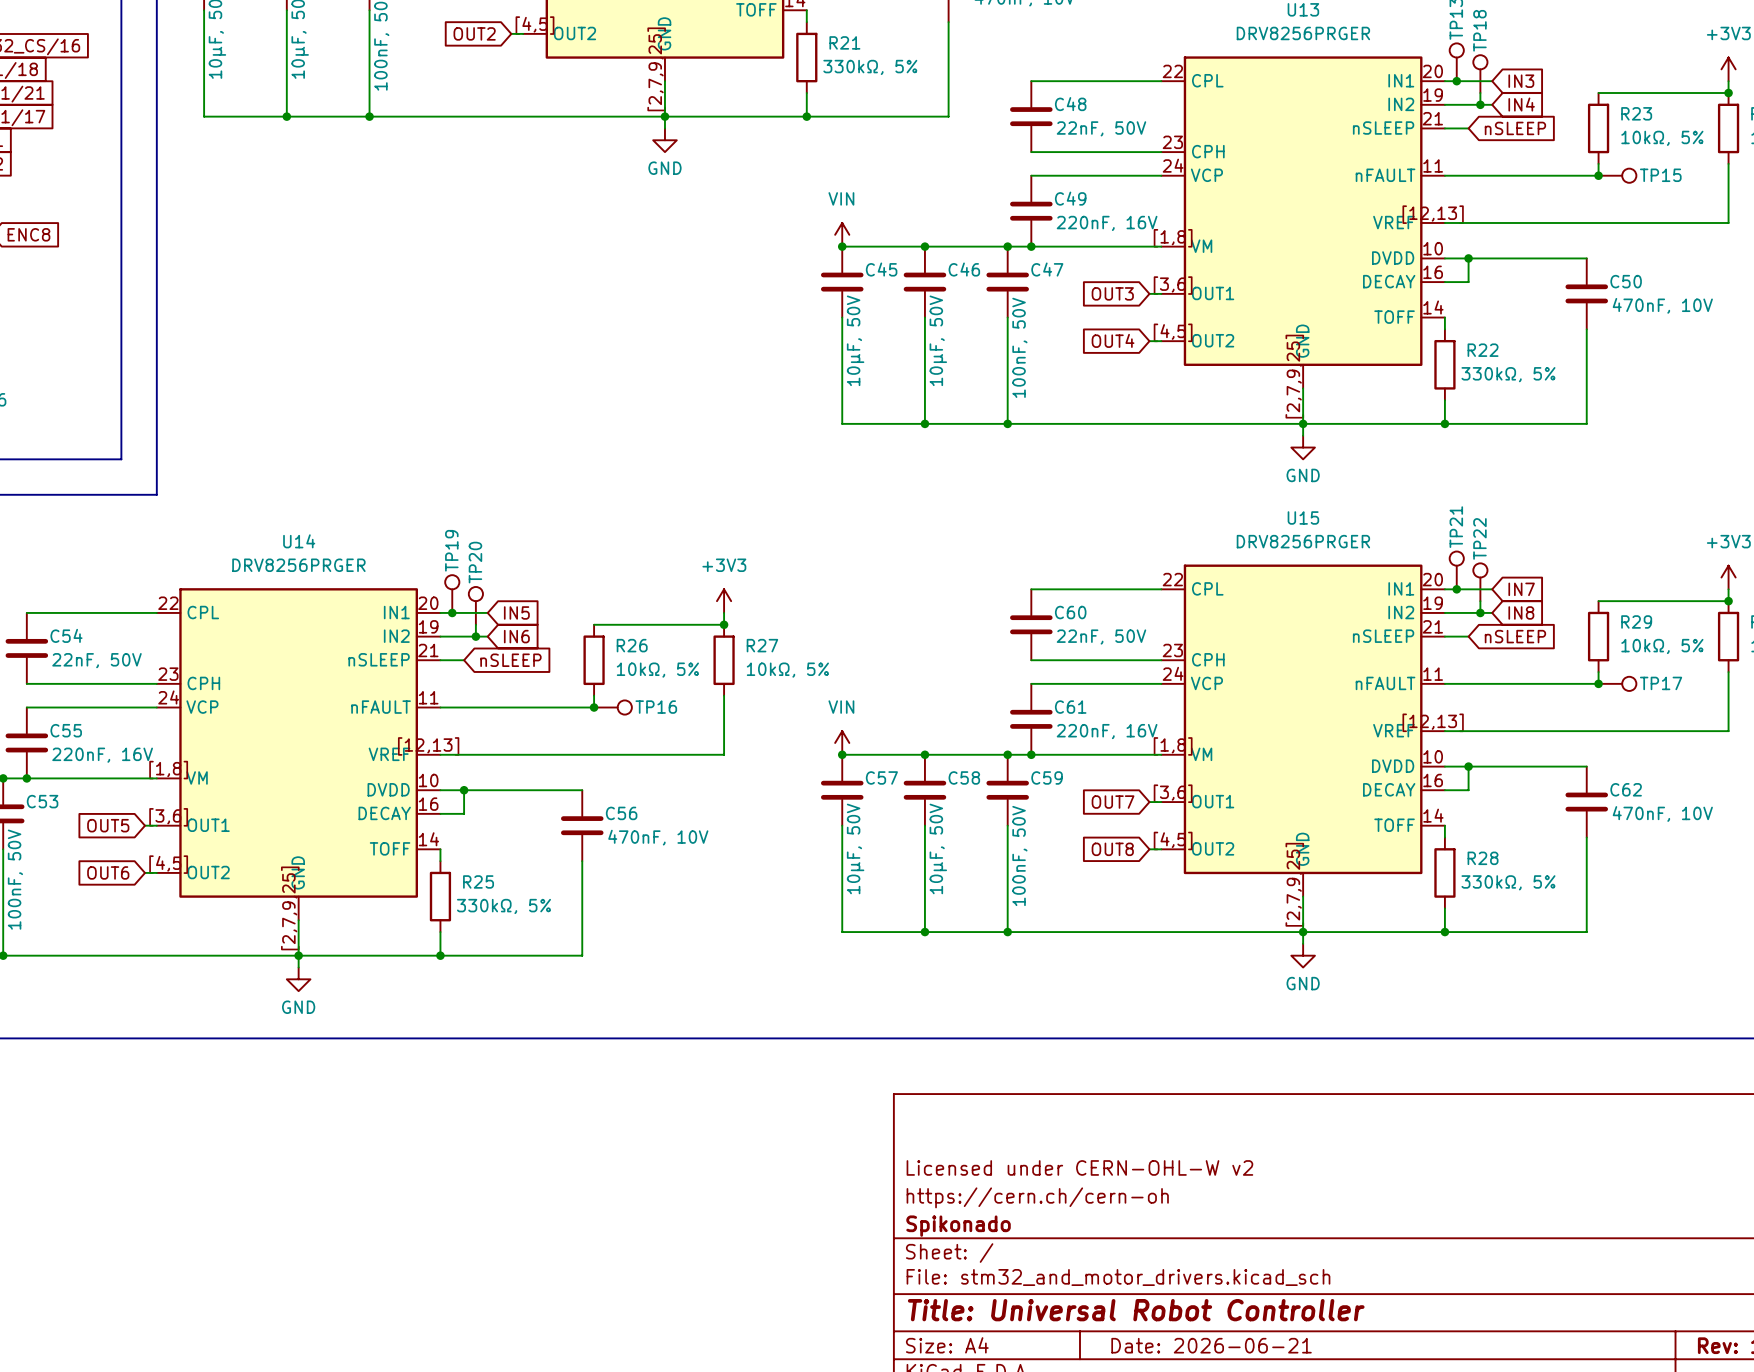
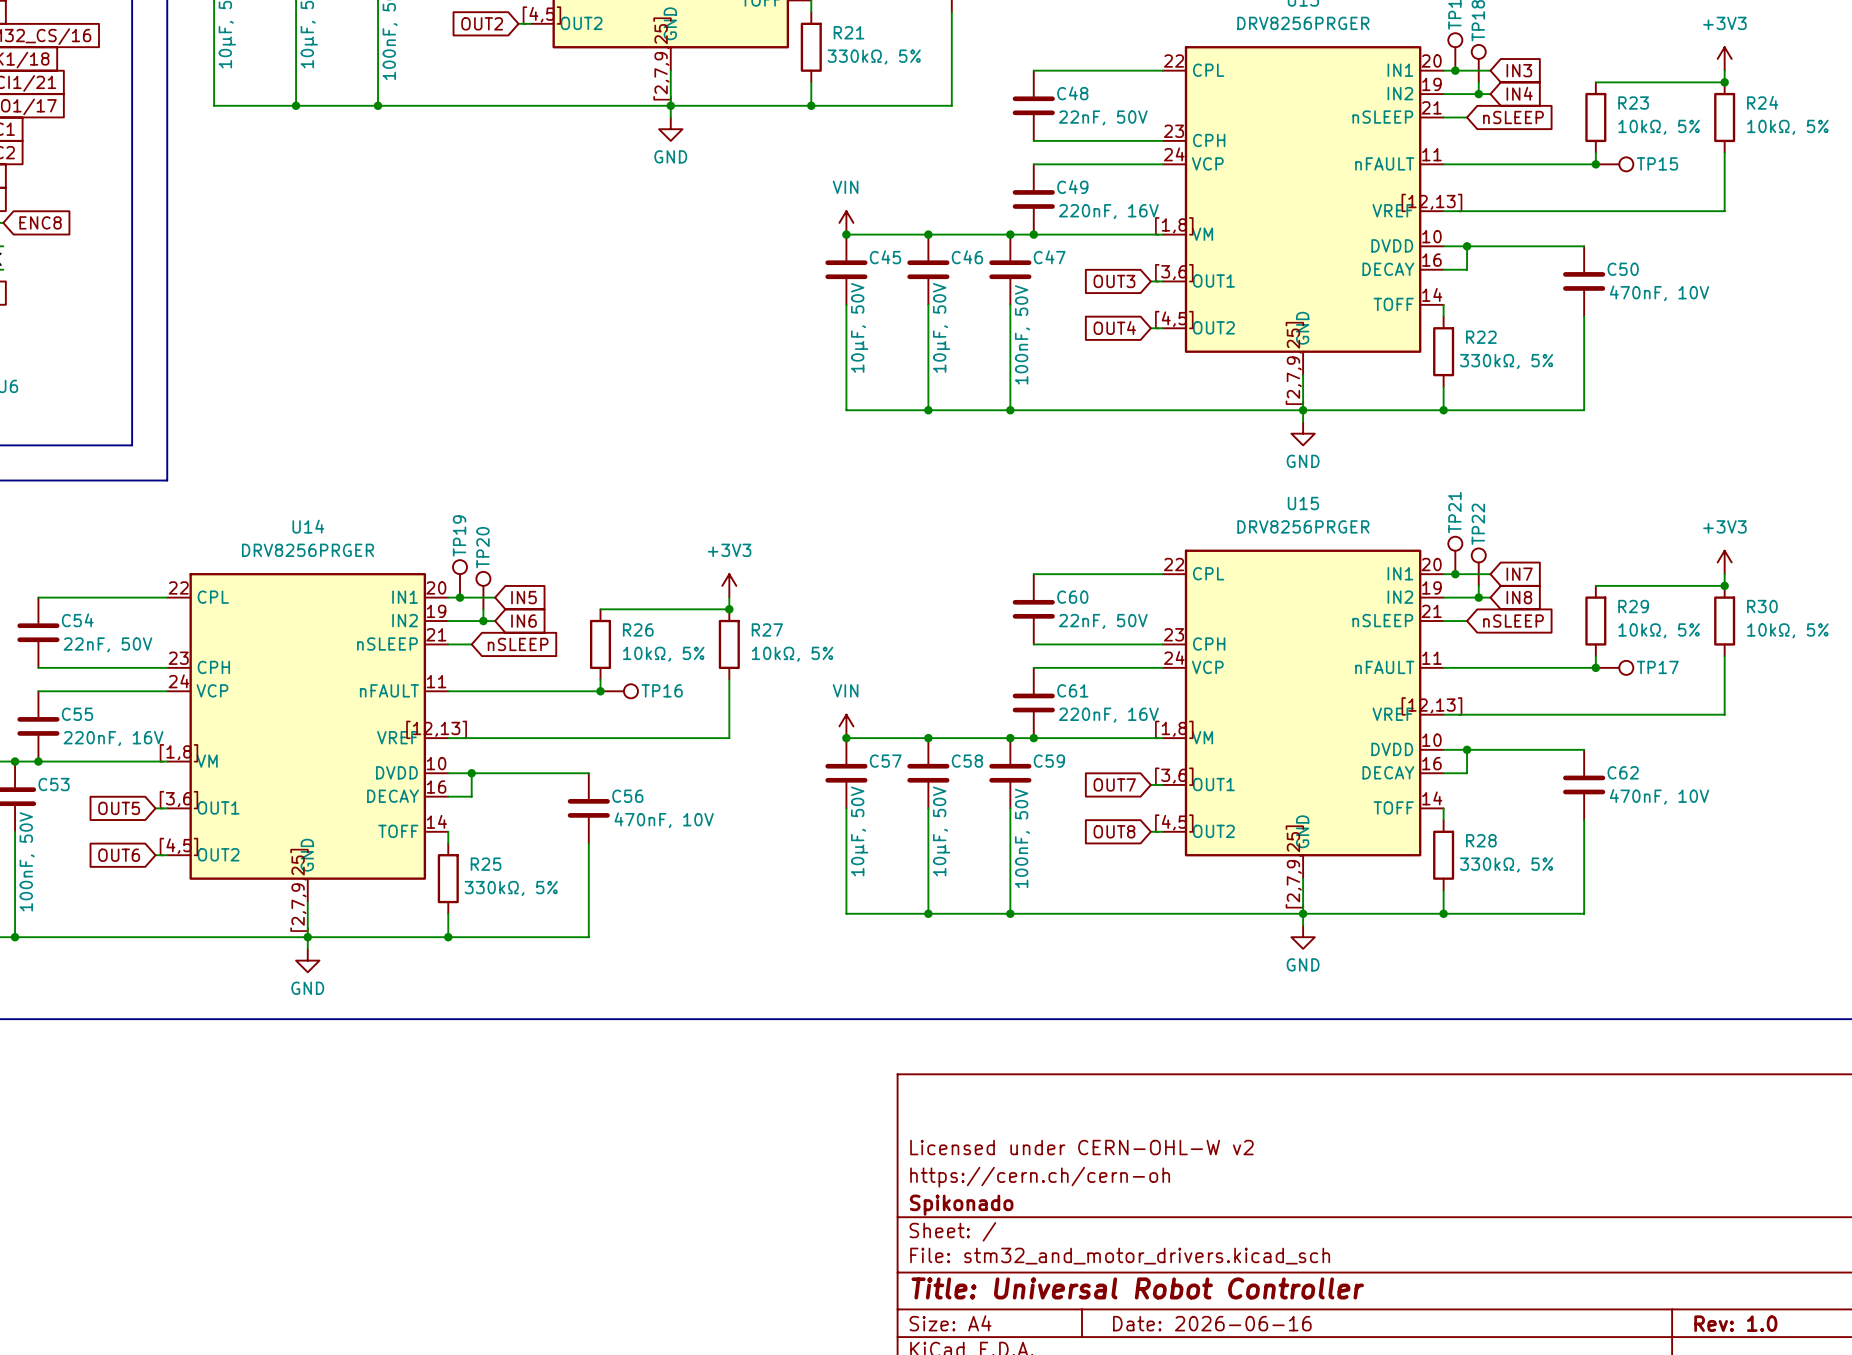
title block: Date: 2026-06-21 (1211, 1345) -> Date: 2026-06-16 (1212, 1323)

